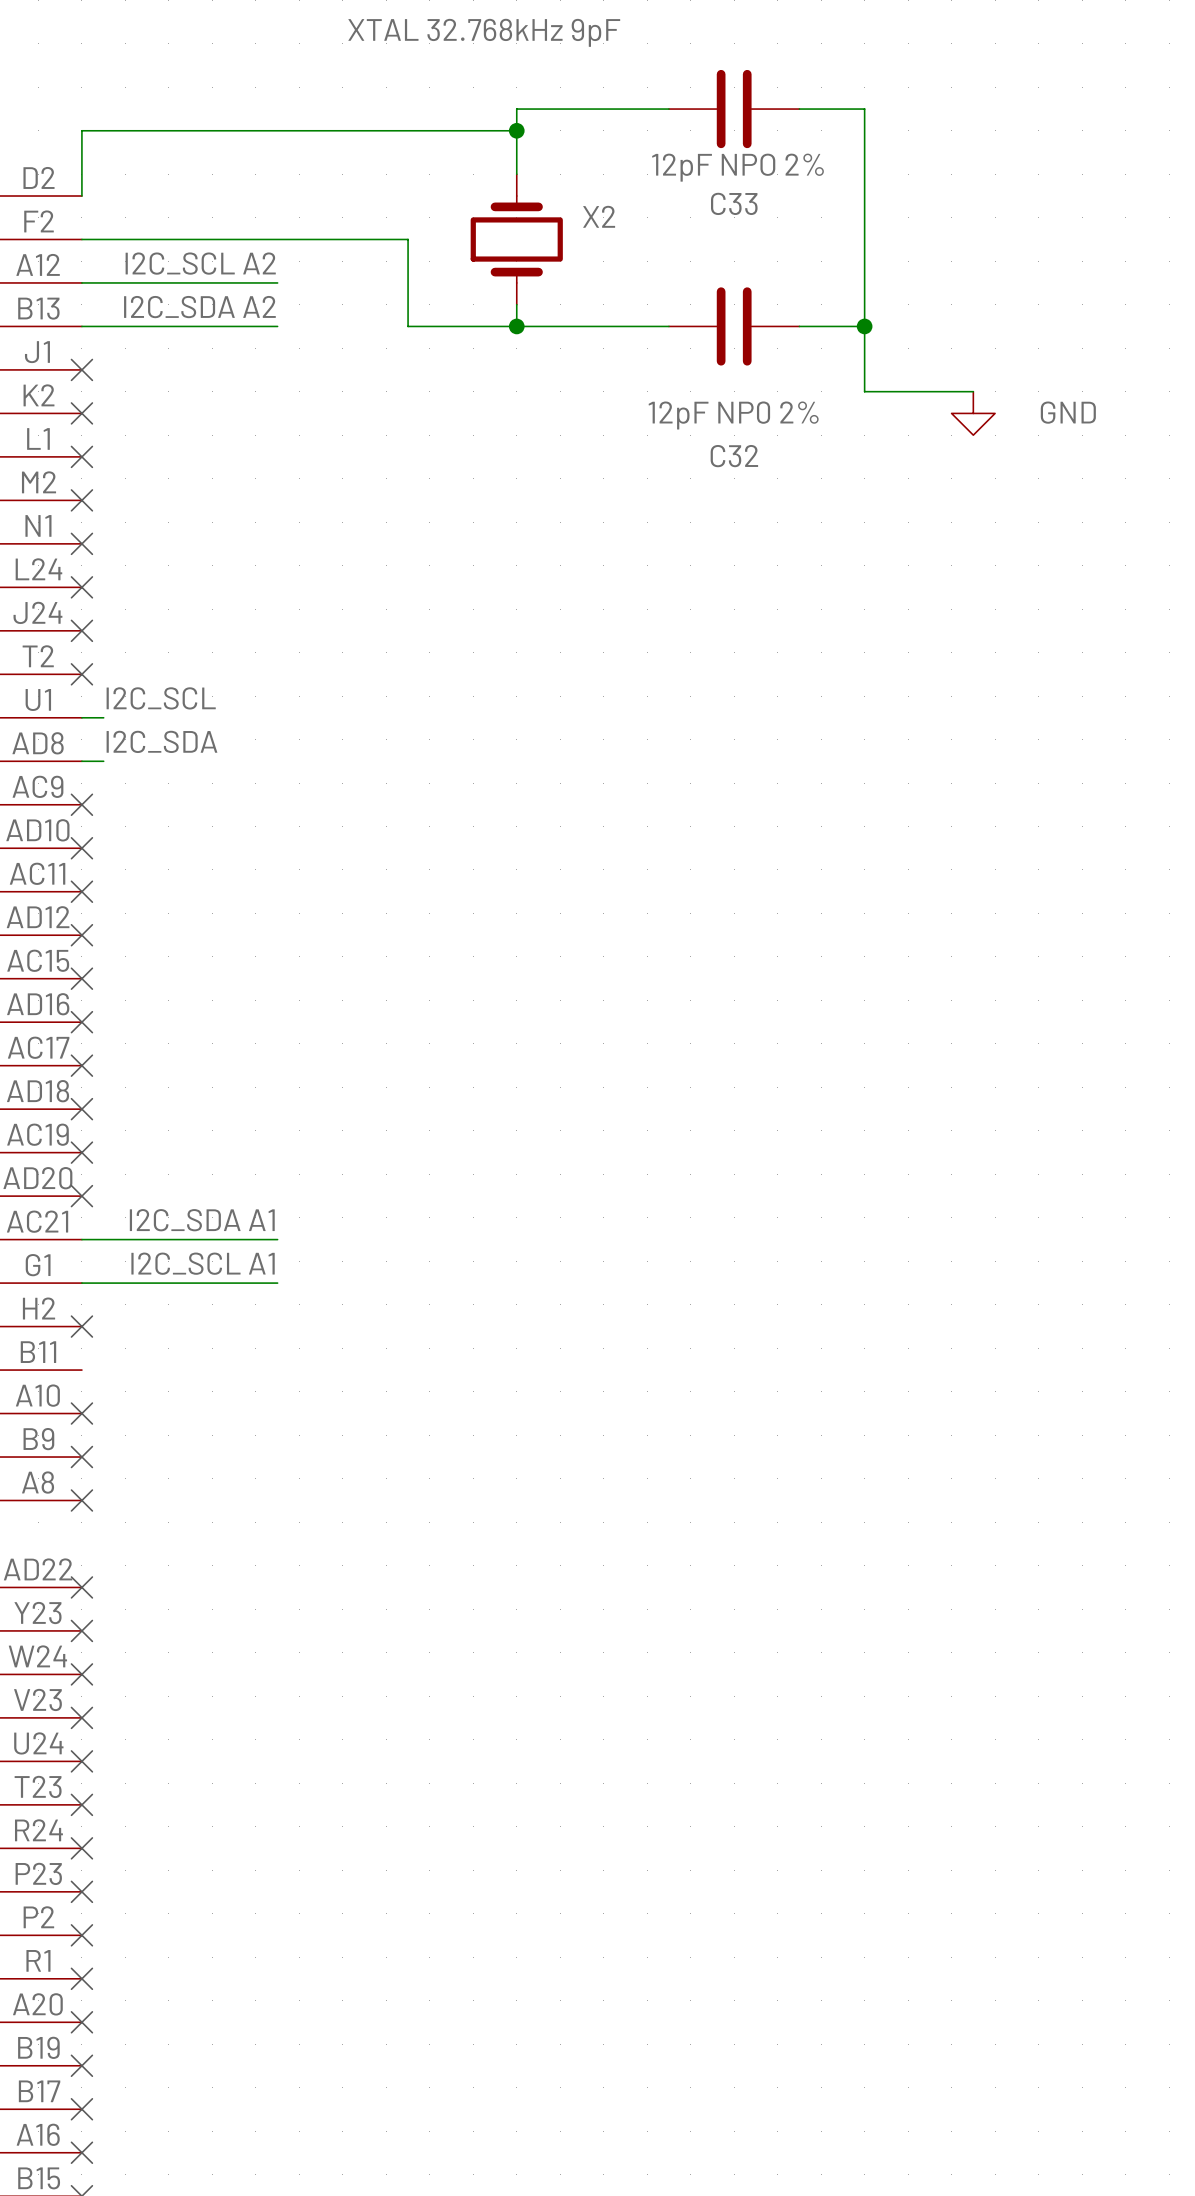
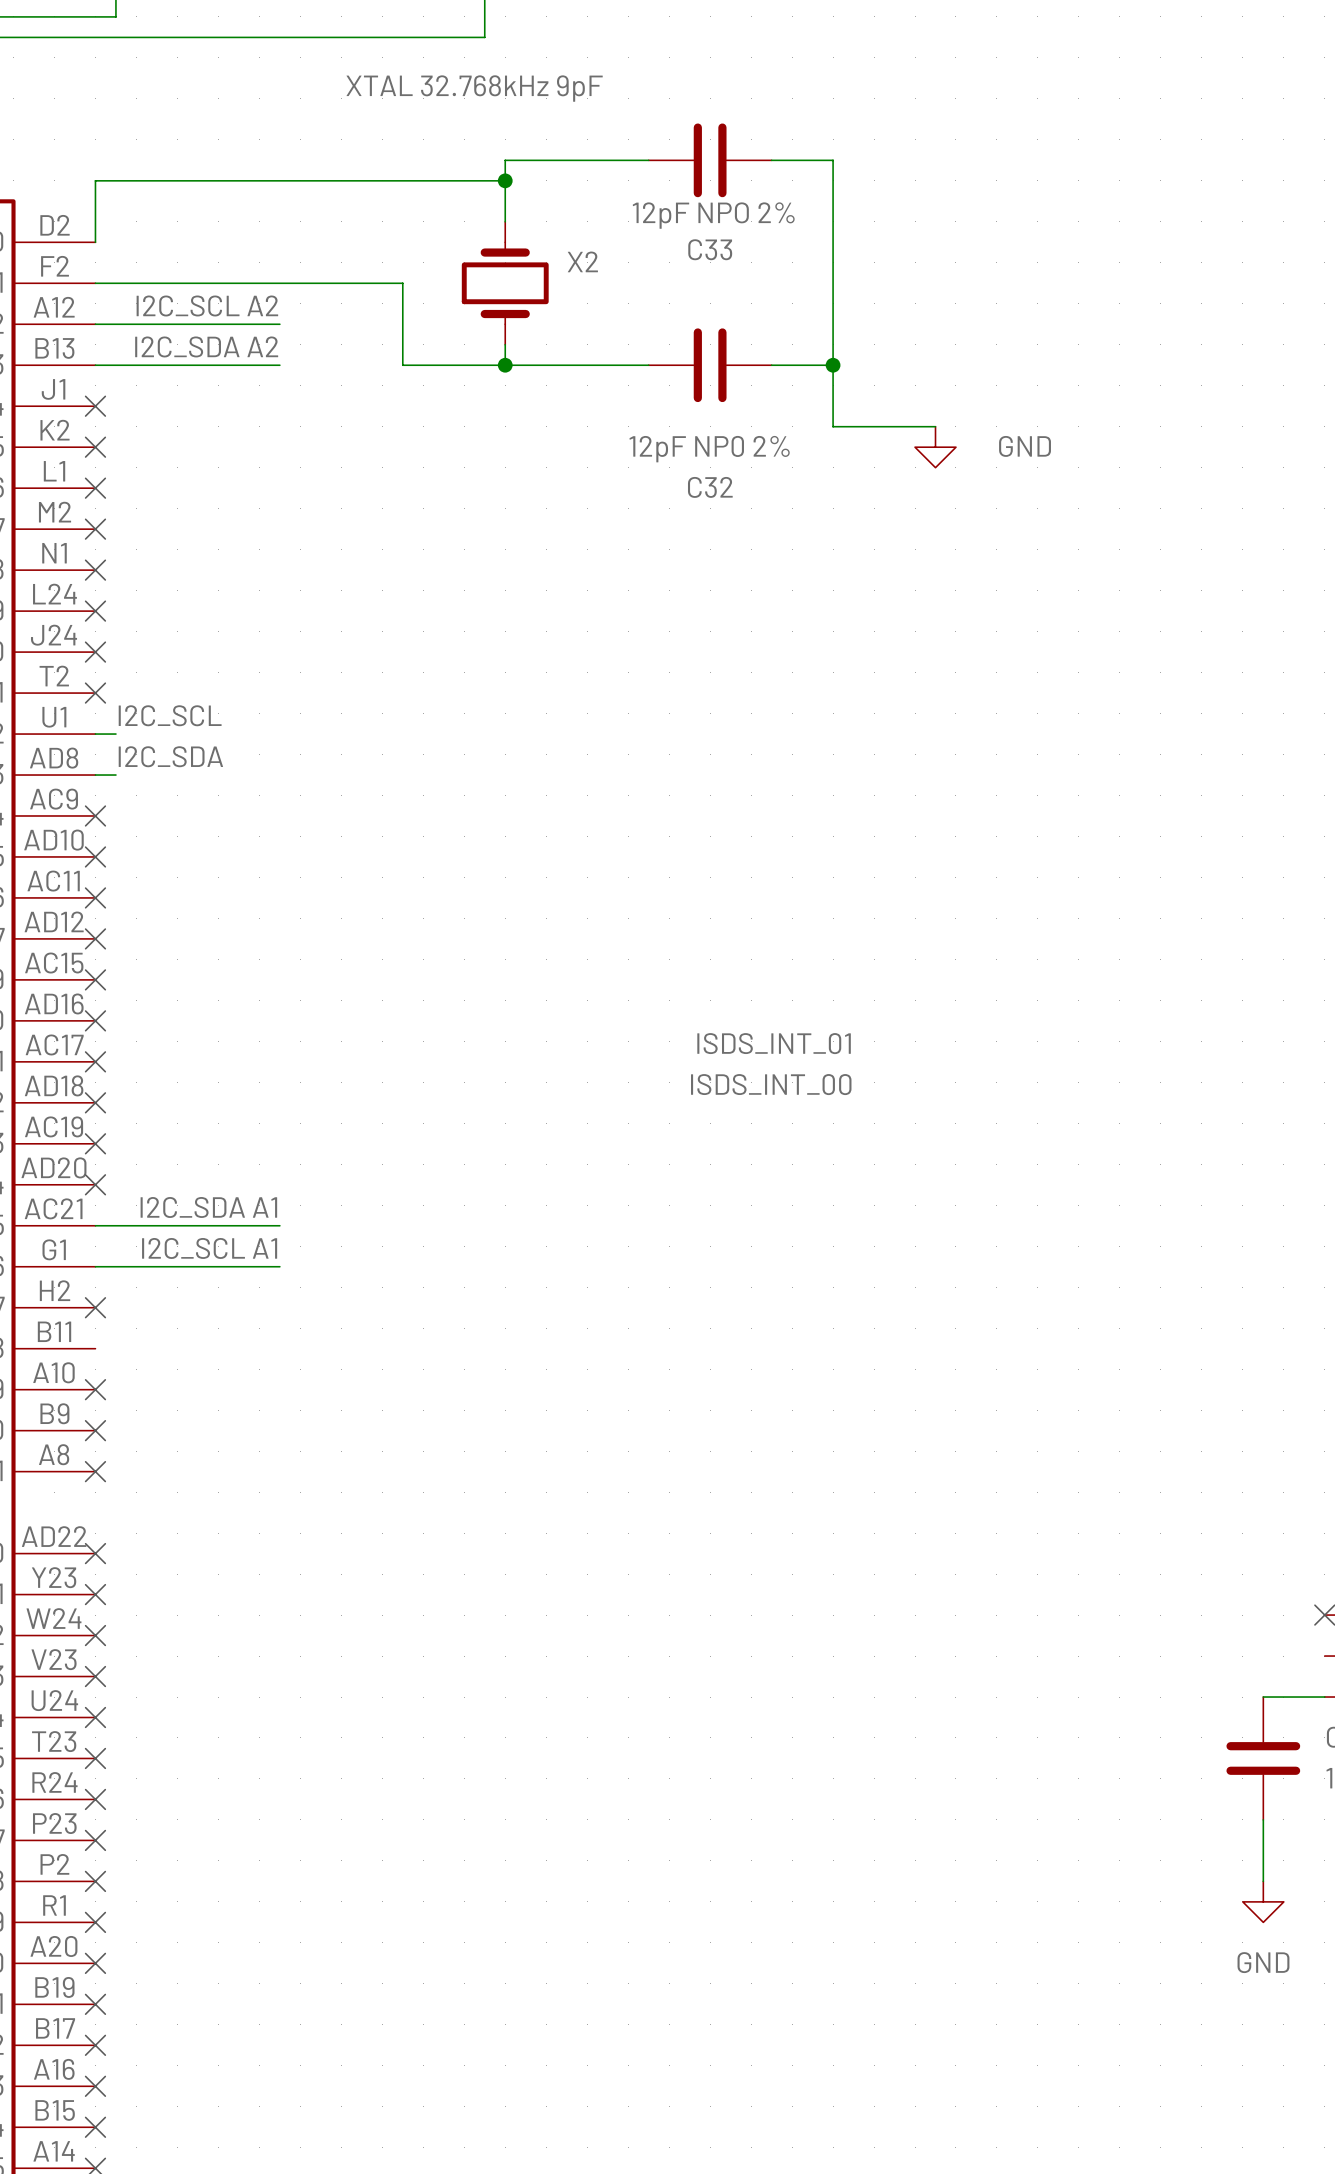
label: none -> ISDS_INT_01 (774, 1043)
label: none -> ISDS_INT_00 (771, 1084)

